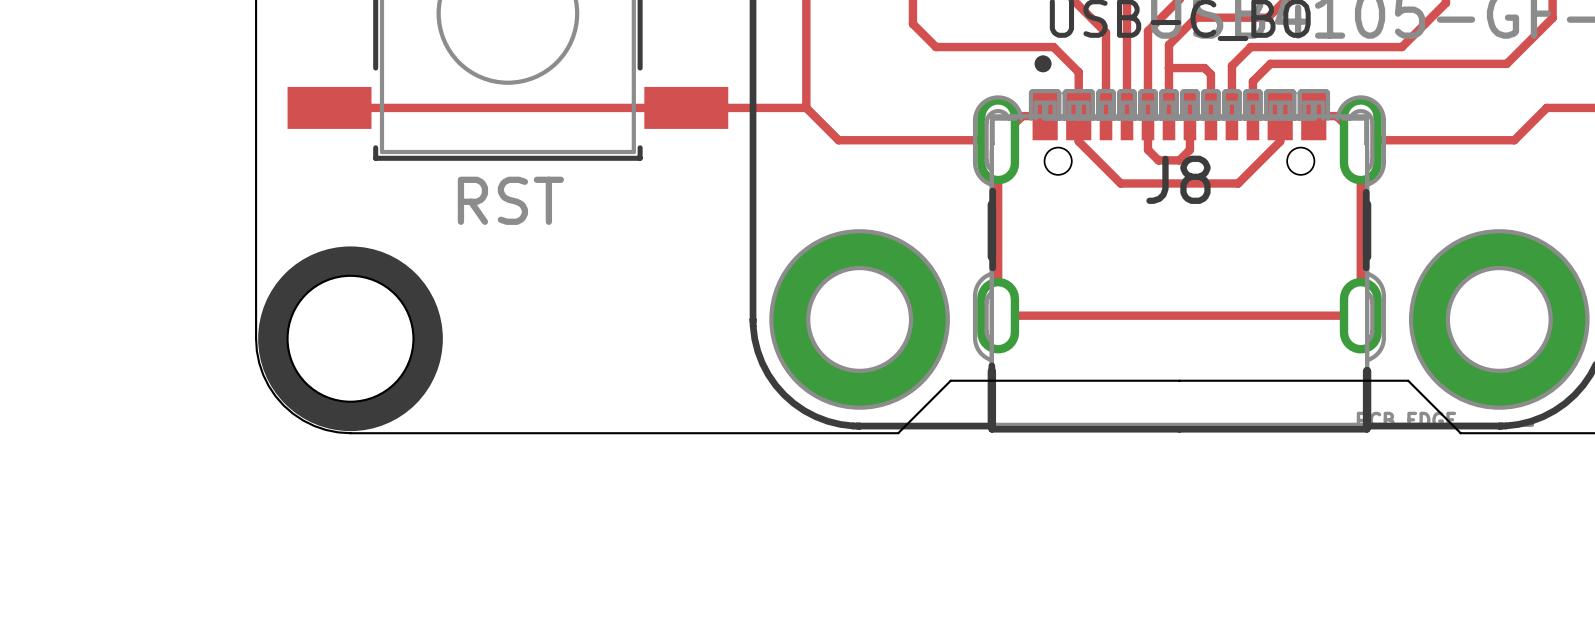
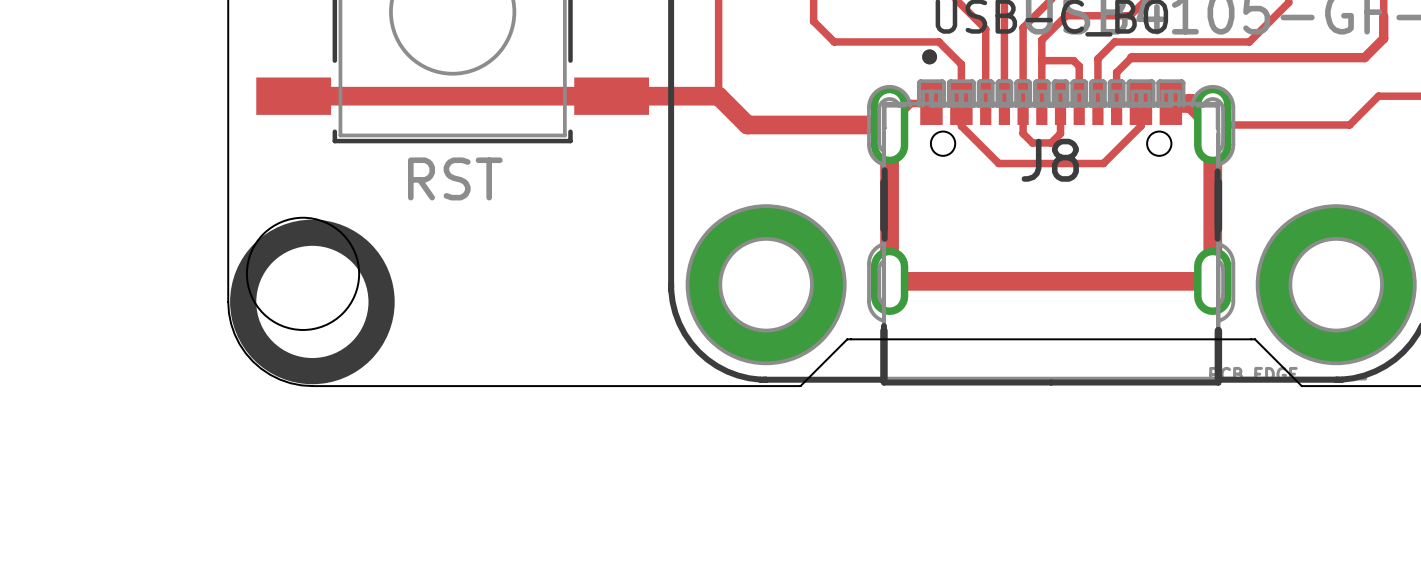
track: (1552, 18) (1506, 63) (1269, 64) -> (1383, 16) (1383, 38) (1364, 57) (1131, 57)
track width: thin (329, 107) (806, 107) (838, 140) (998, 140) (998, 315) (1360, 315) (1360, 140) (1336, 116) (1313, 116) -> thick (293, 96) (718, 96) (747, 124) (889, 124) (889, 281) (1212, 281) (1212, 124) (1191, 103) (1170, 103)
round board edge position: (350, 338) -> (303, 273)

